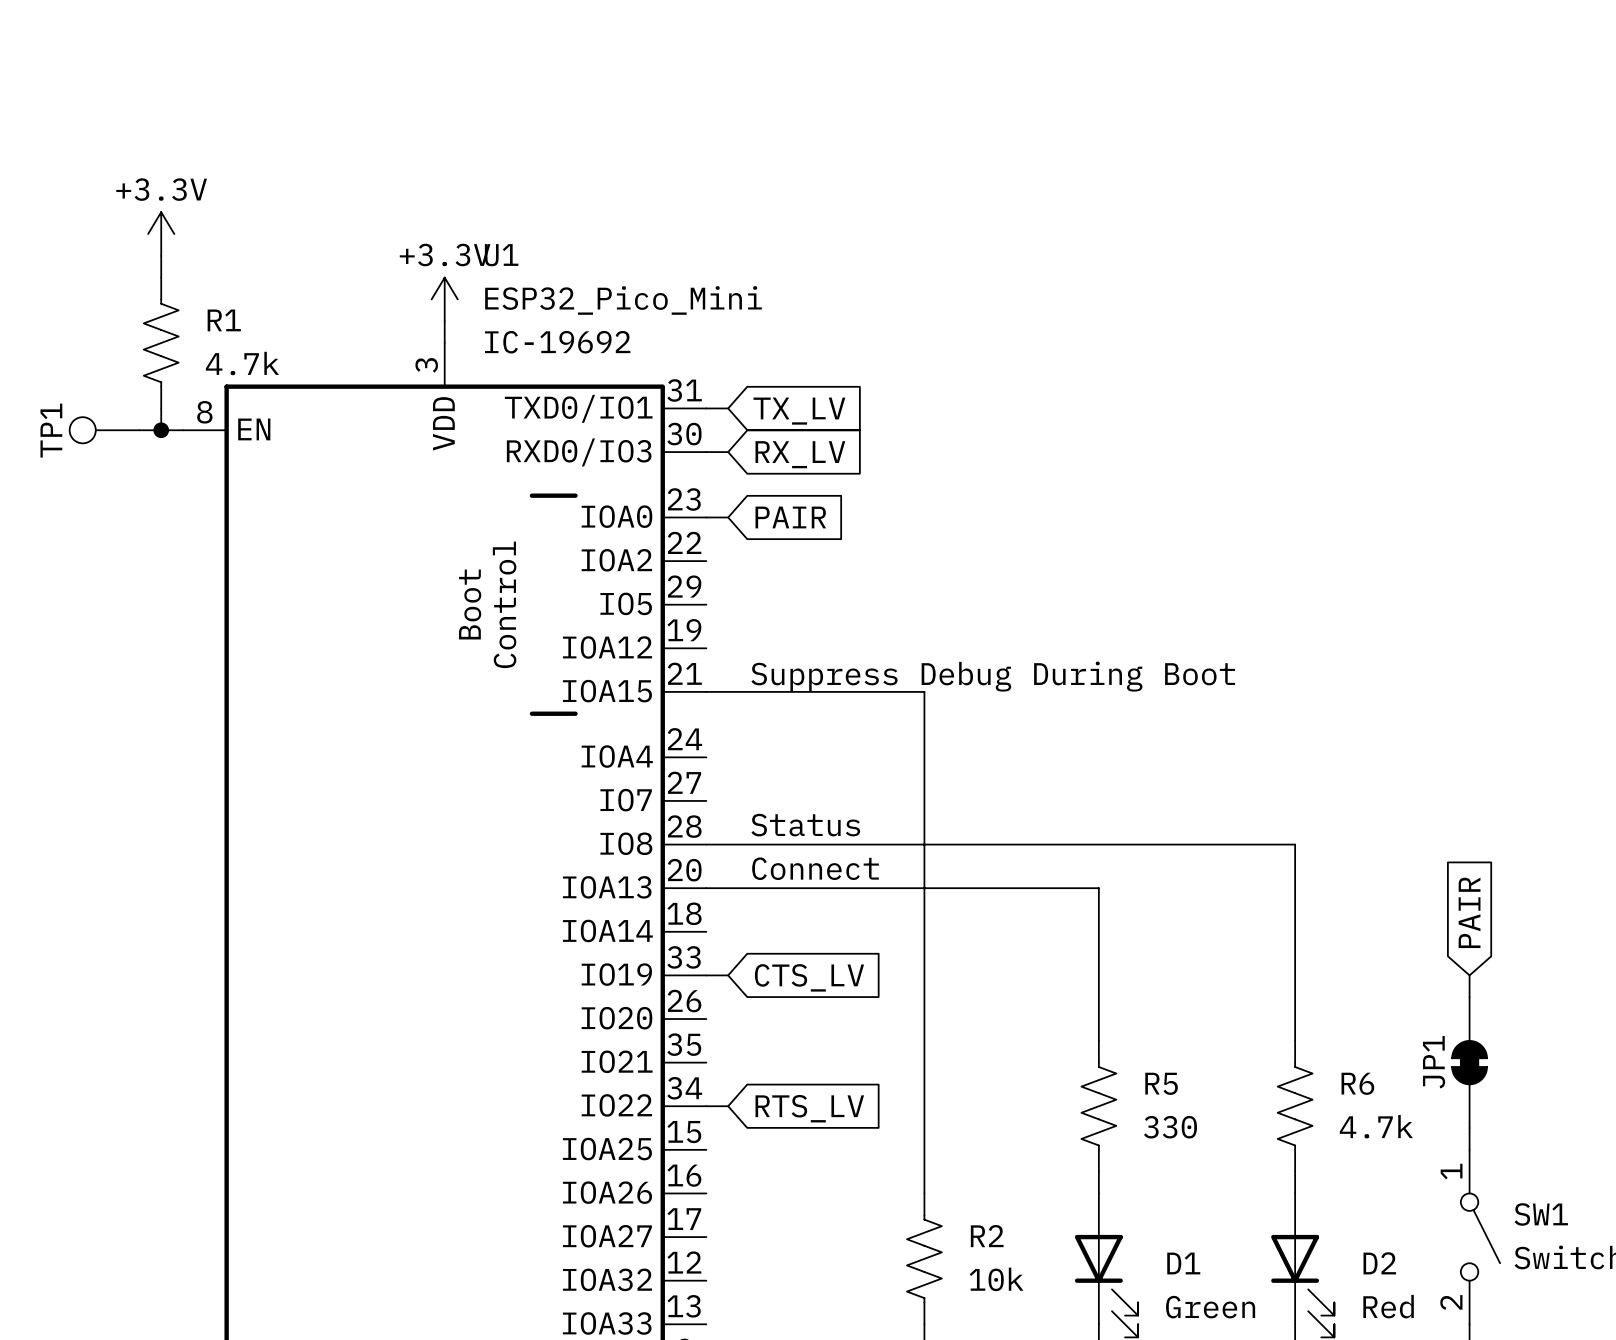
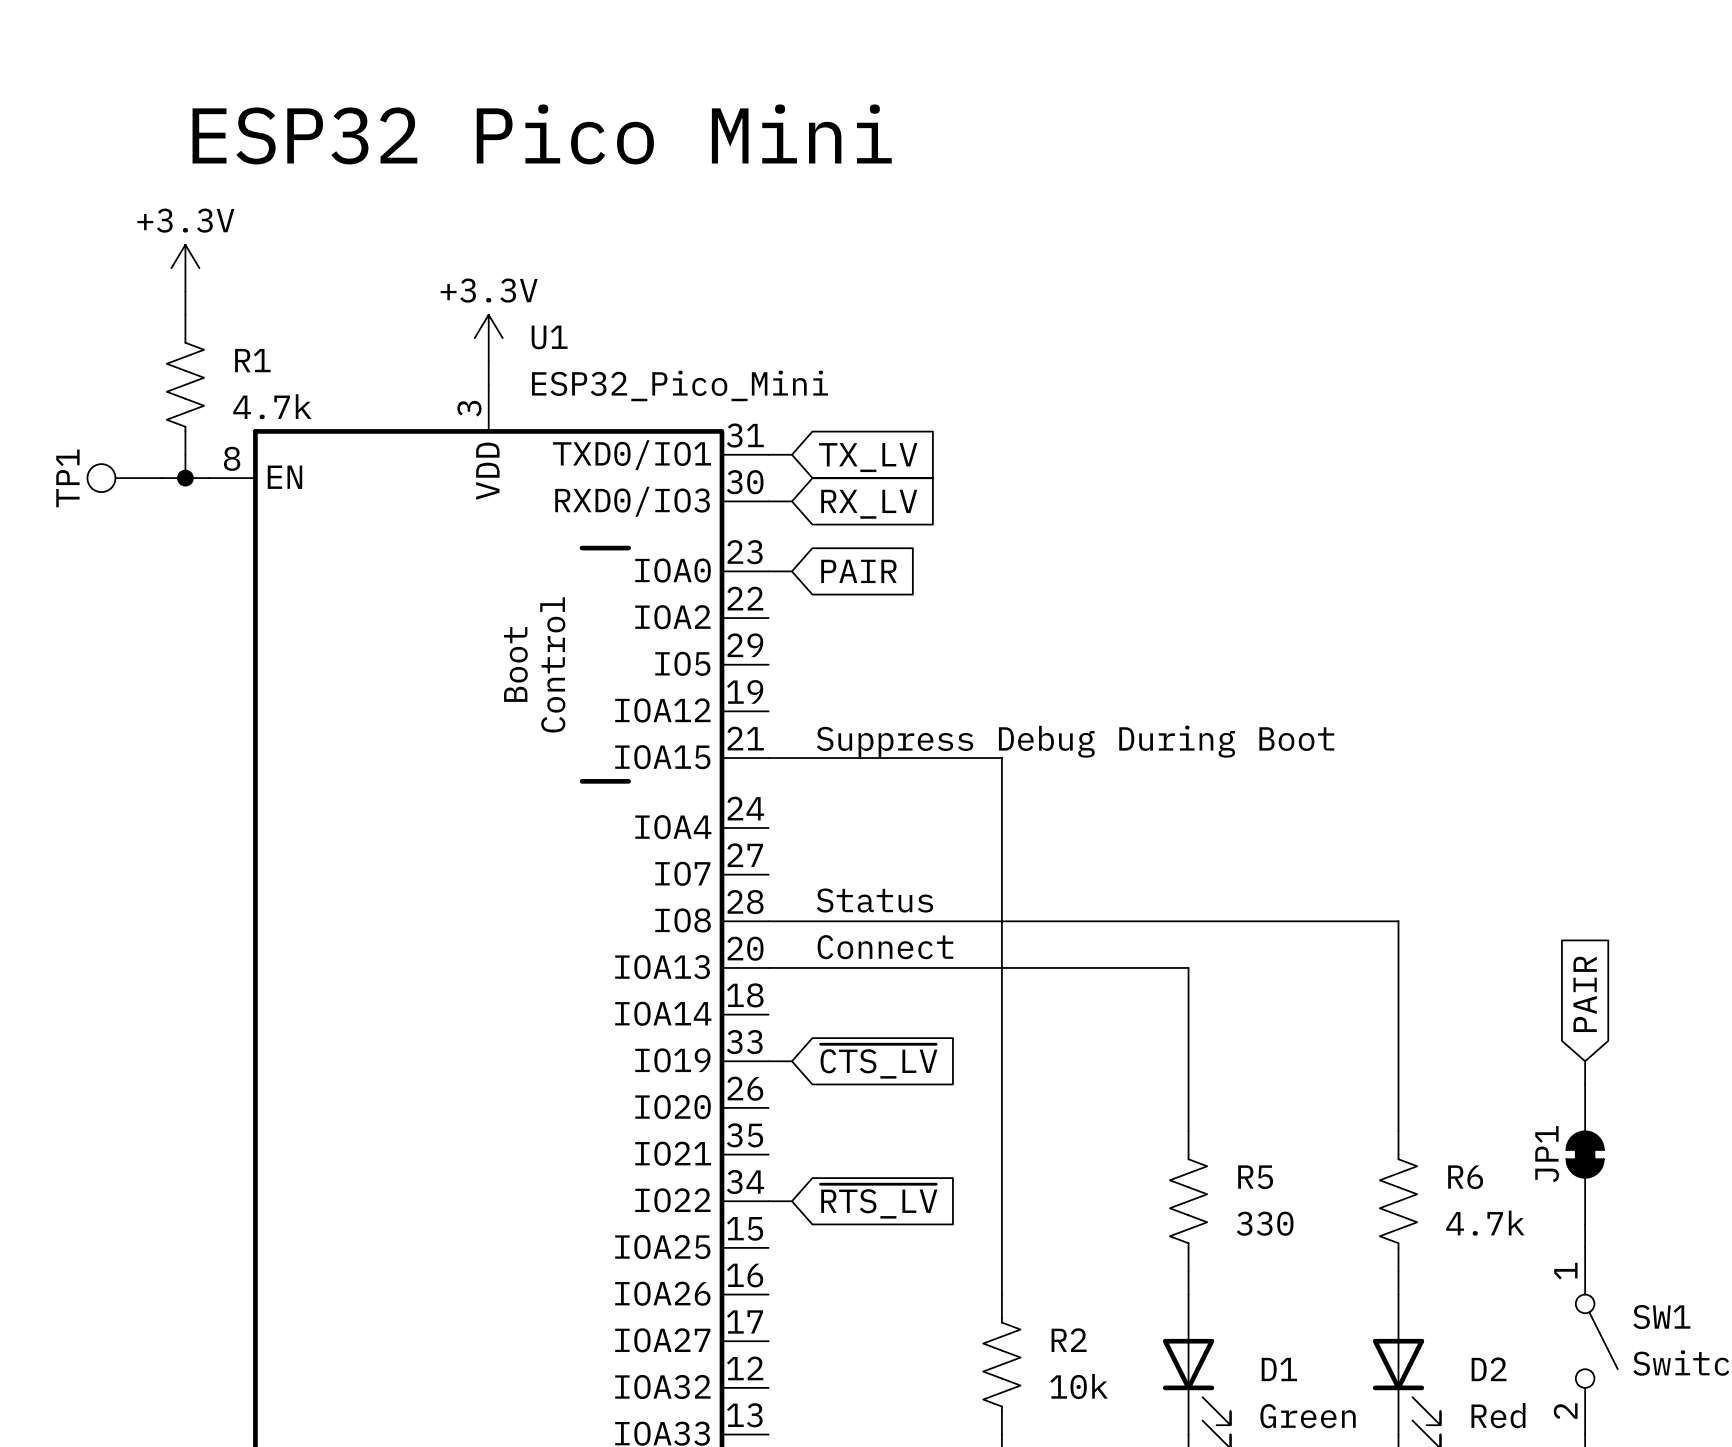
text: none -> ESP32 Pico Mini (542, 134)
U1 name position: U1 (501, 255) -> U1 (549, 337)
U1 value position: ESP32_Pico_Mini (623, 300) -> ESP32_Pico_Mini (680, 385)
U1 text: IC-19692 (557, 342) -> none
global label: CTS_LV (809, 977) -> ~{CTS_LV} (878, 1061)
global label: RTS_LV (809, 1108) -> ~{RTS_LV} (878, 1201)

